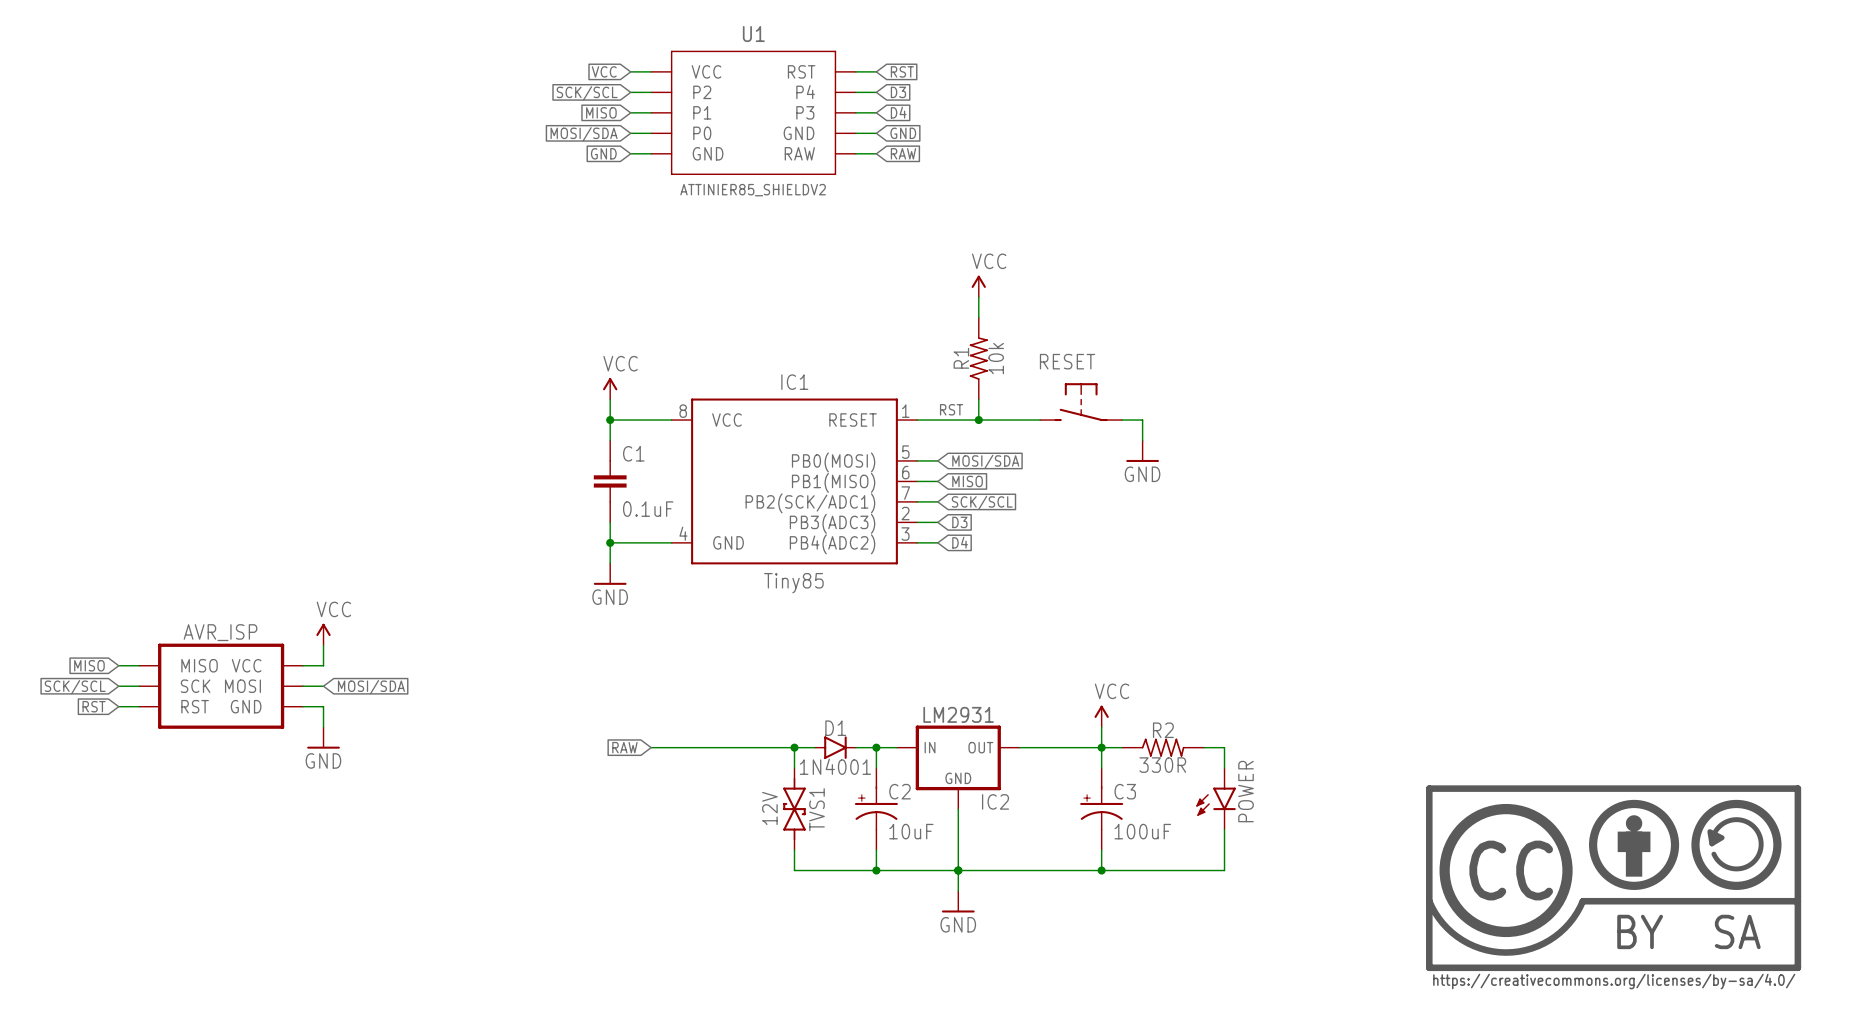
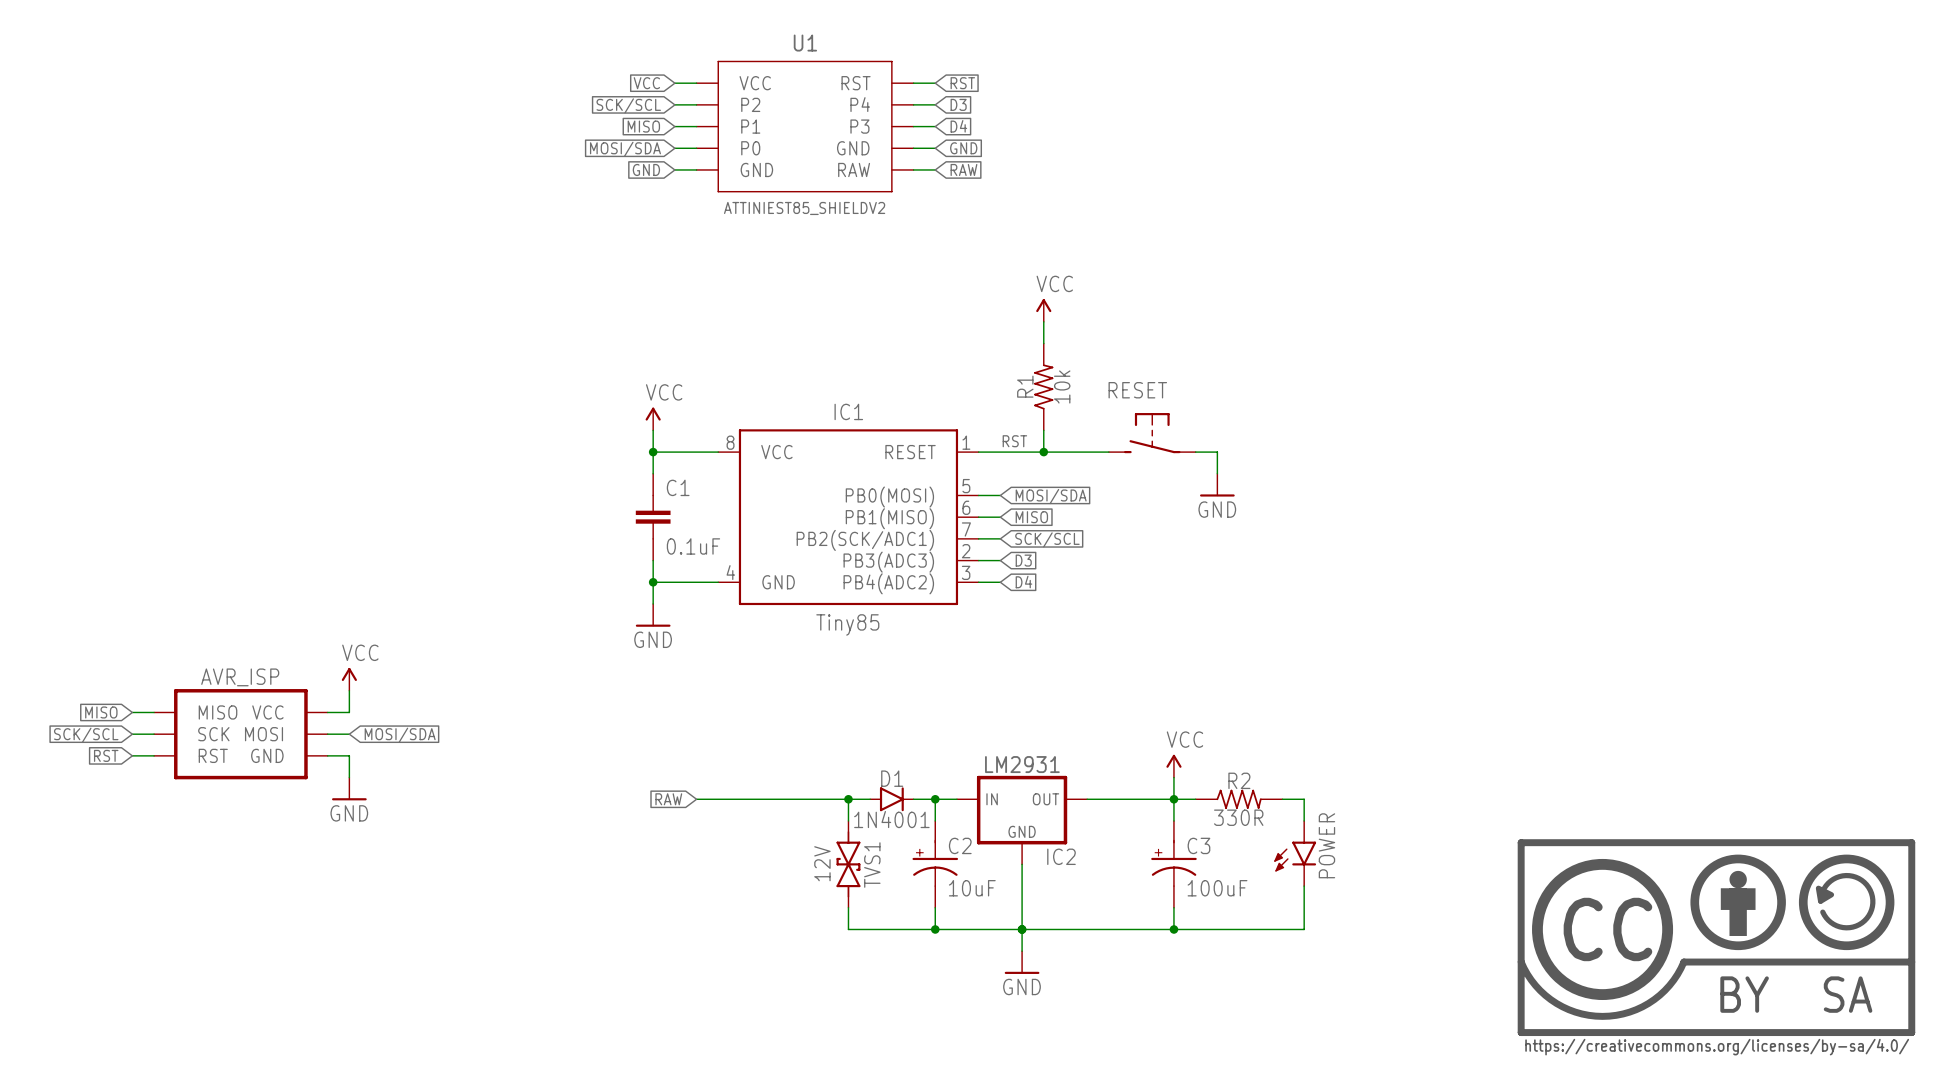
U1 value: ATTINIER85_SHIELDV2 (753, 190) -> ATTINIEST85_SHIELDV2 (804, 208)

